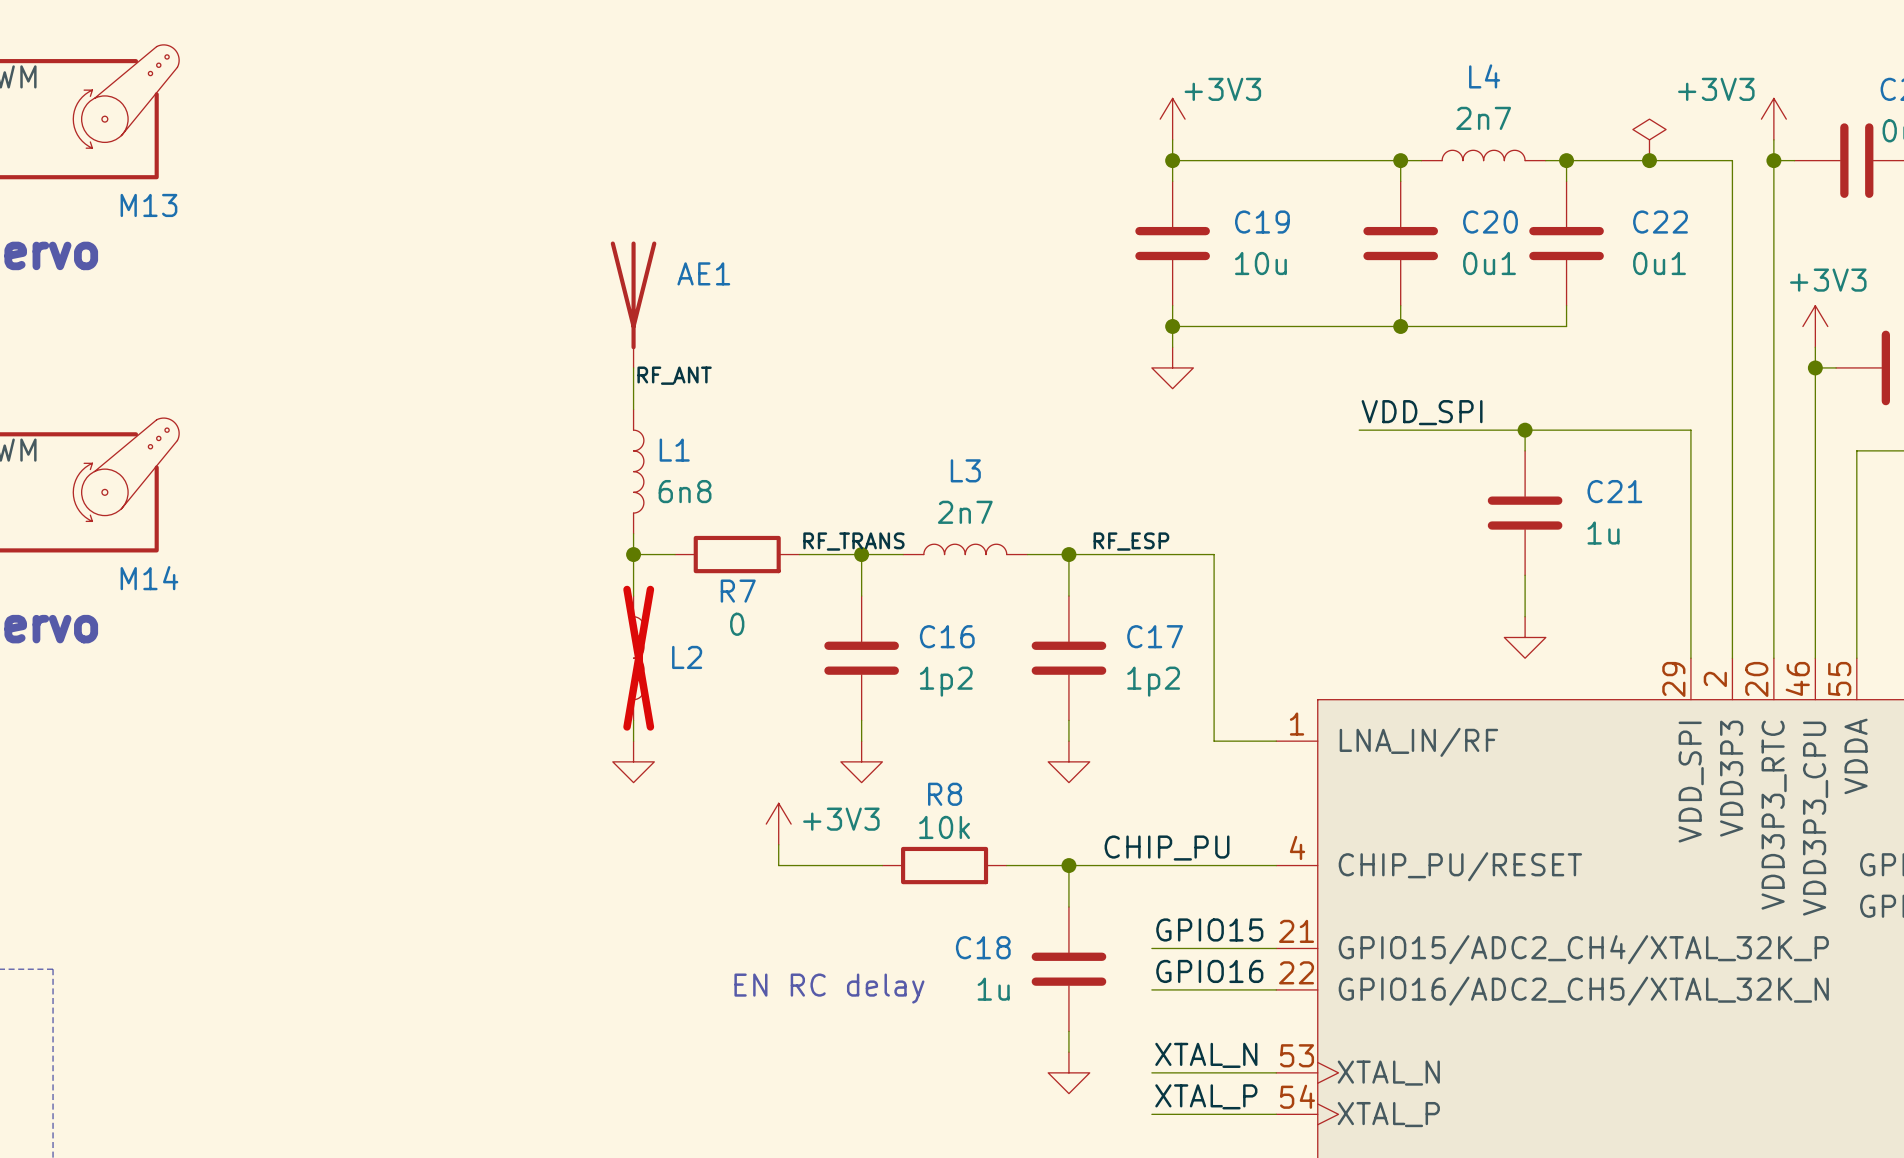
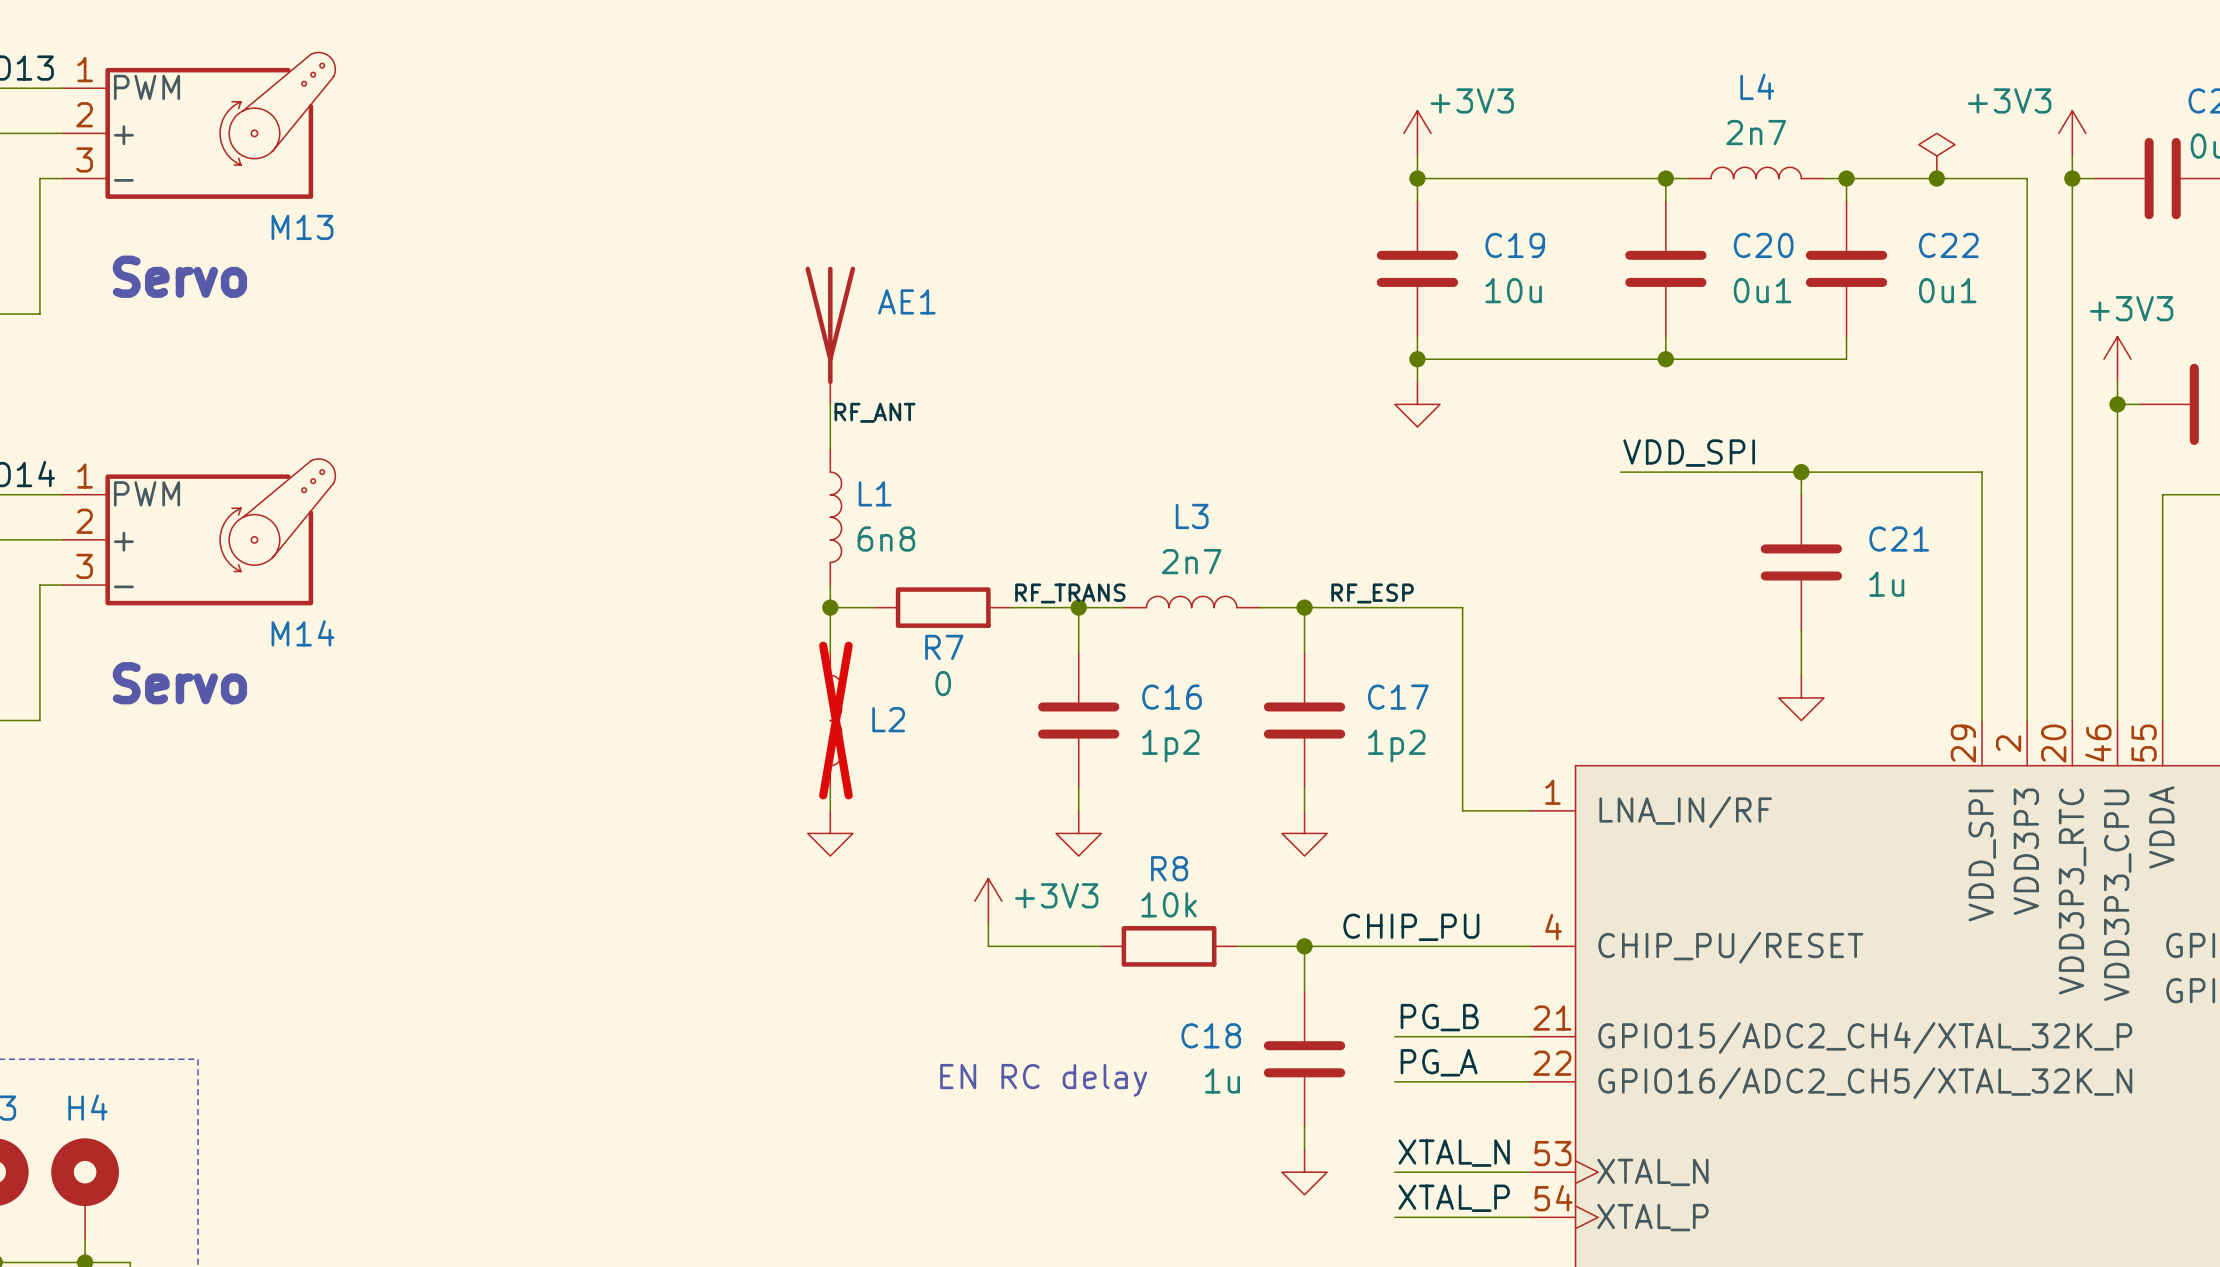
label: GPIO15 (1209, 929) -> PG_B (1439, 1017)
label: GPIO16 (1209, 971) -> PG_A (1439, 1062)

